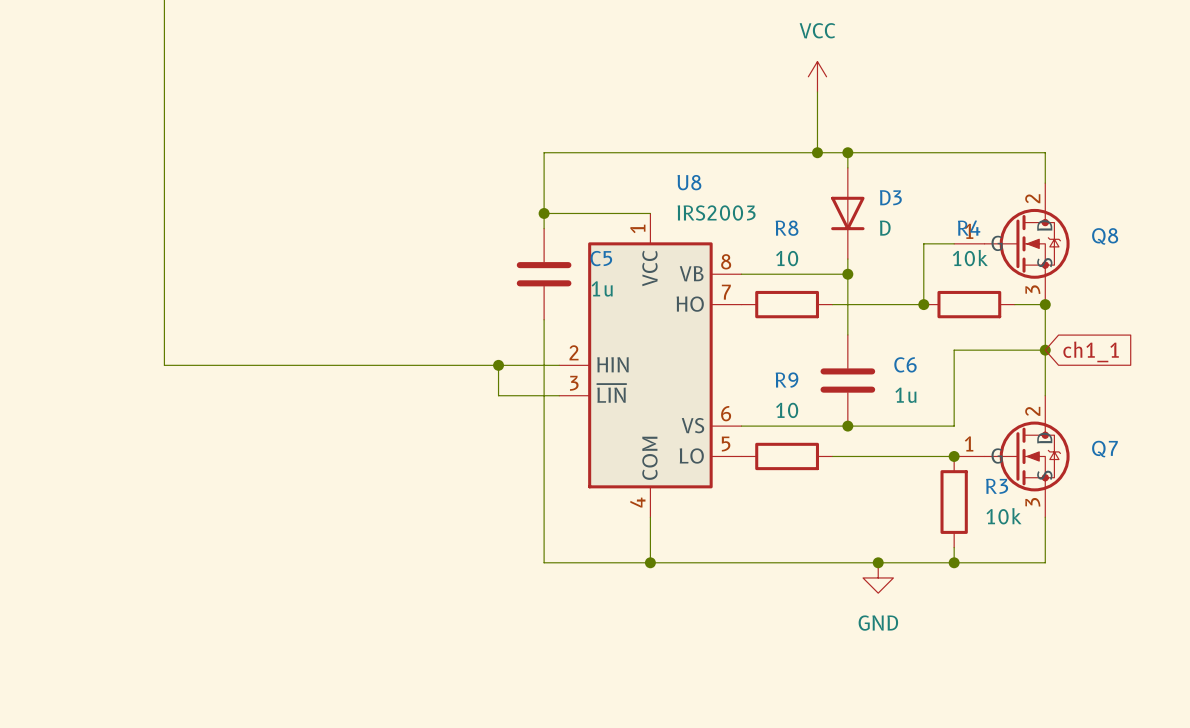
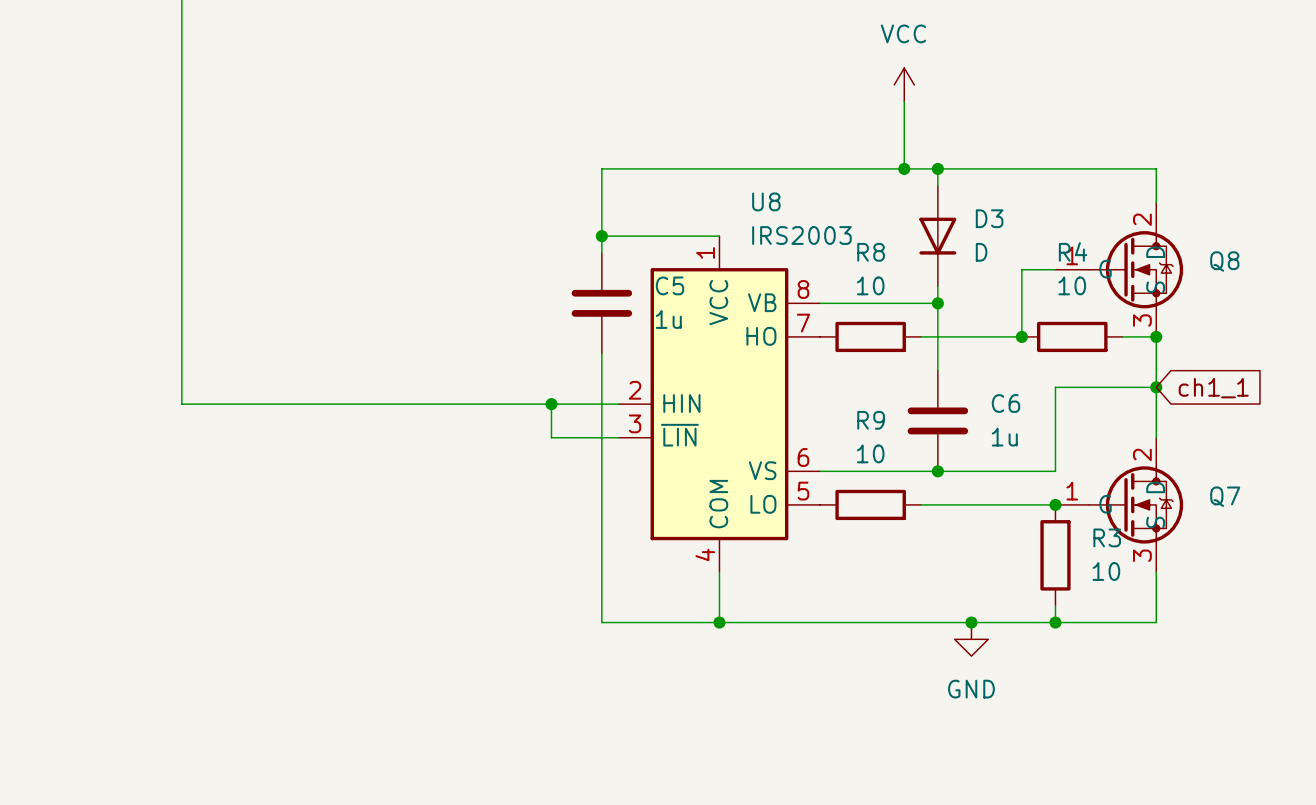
R4 value: 10k (970, 258) -> 10 (1072, 285)
R3 value: 10k (1004, 516) -> 10 (1106, 571)

